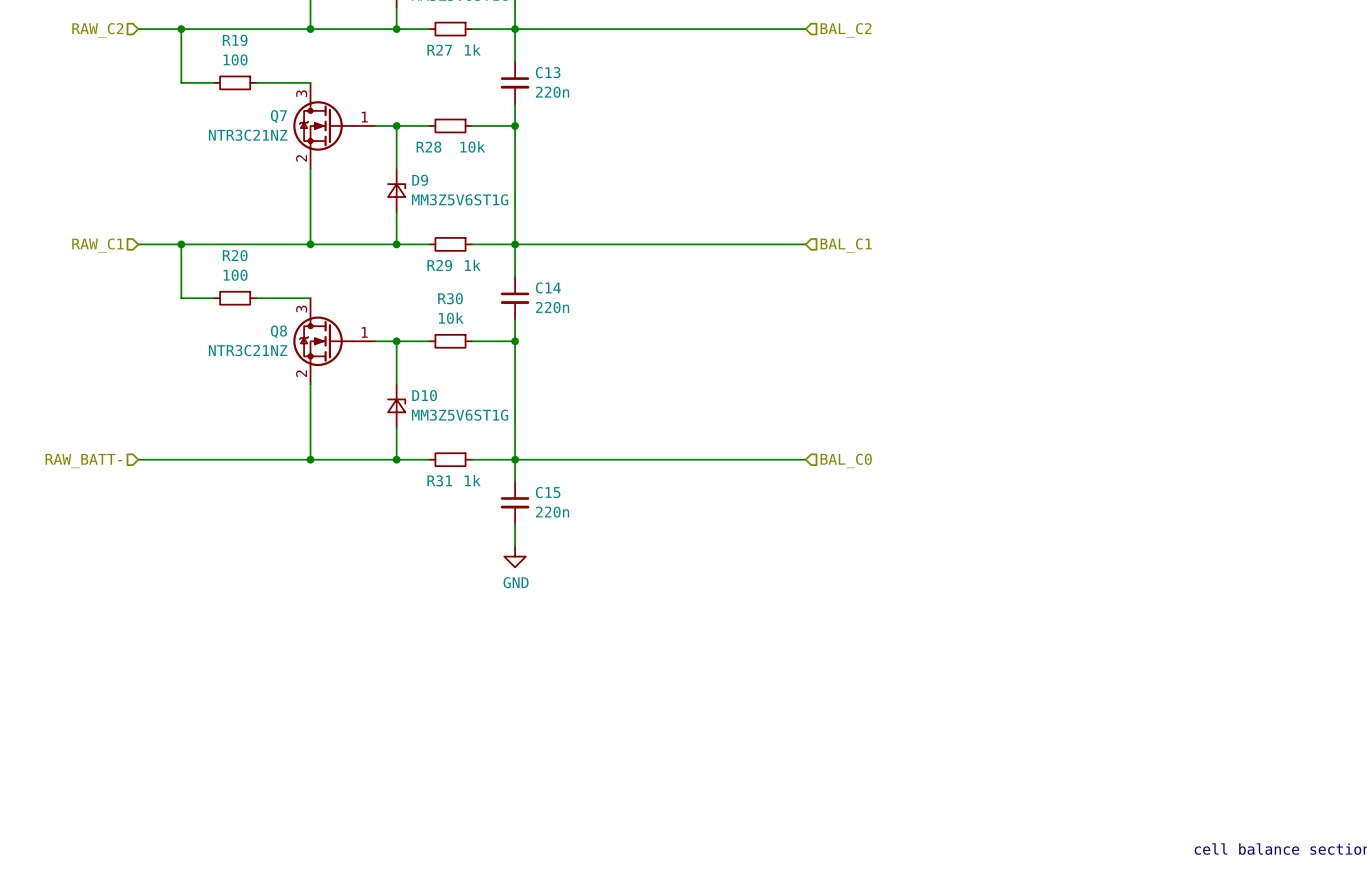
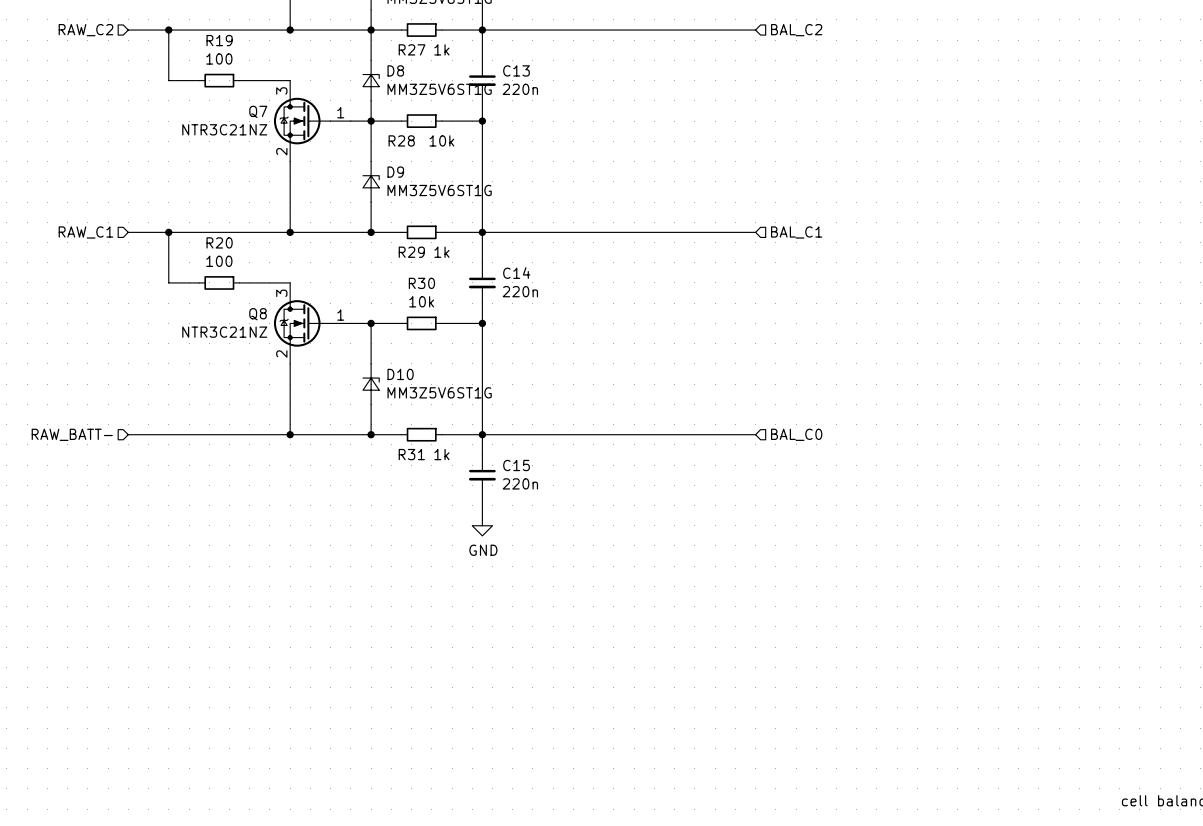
wire: none -> (371, 30) (371, 60)
D8: none -> MM3Z5V6ST1G (371, 80)
wire: none -> (371, 100) (371, 121)

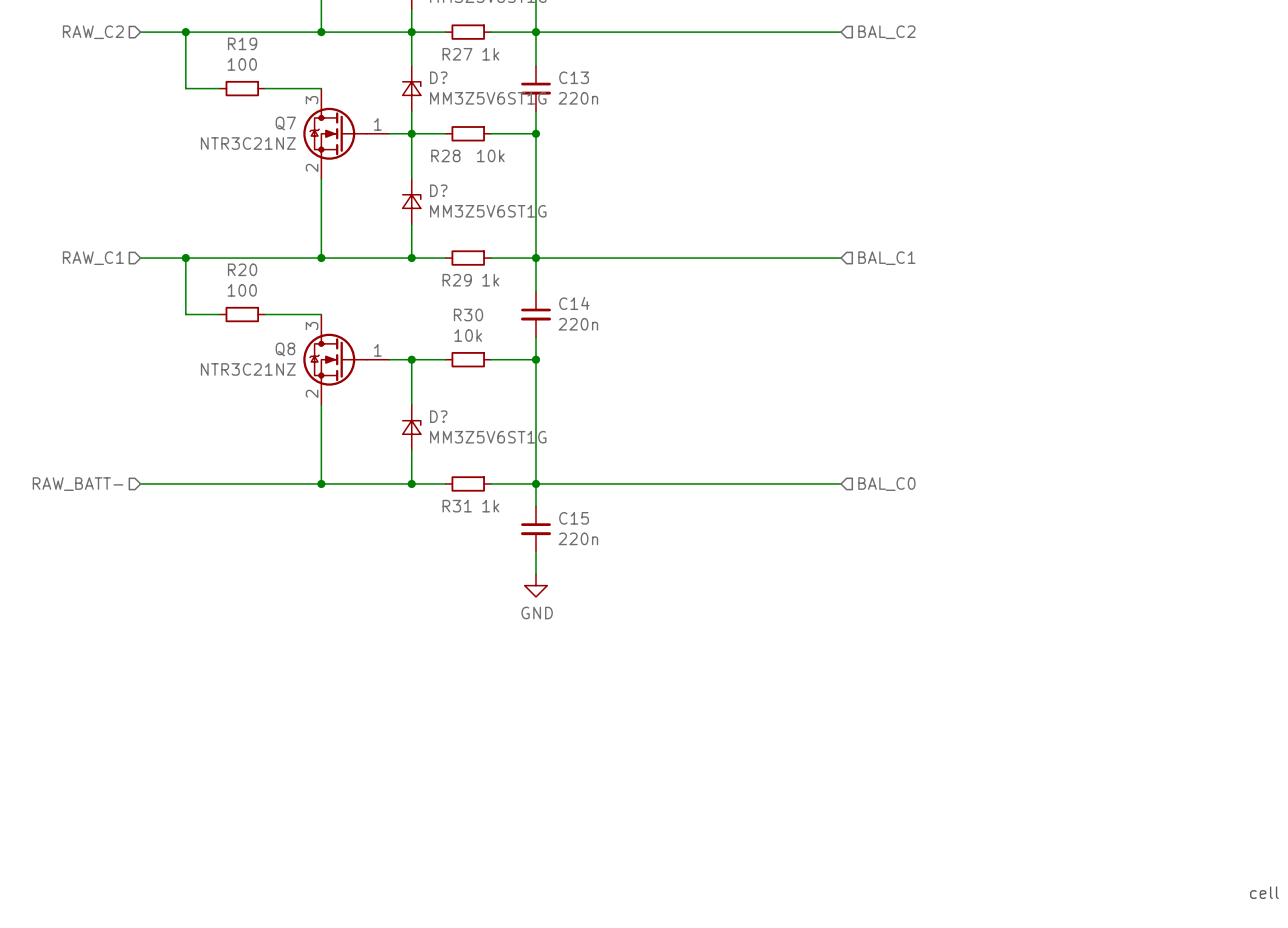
D8 name: D8 (395, 70) -> D? (438, 77)
D9 name: D9 (395, 172) -> D? (438, 190)
D10 name: D10 (400, 374) -> D? (438, 416)

